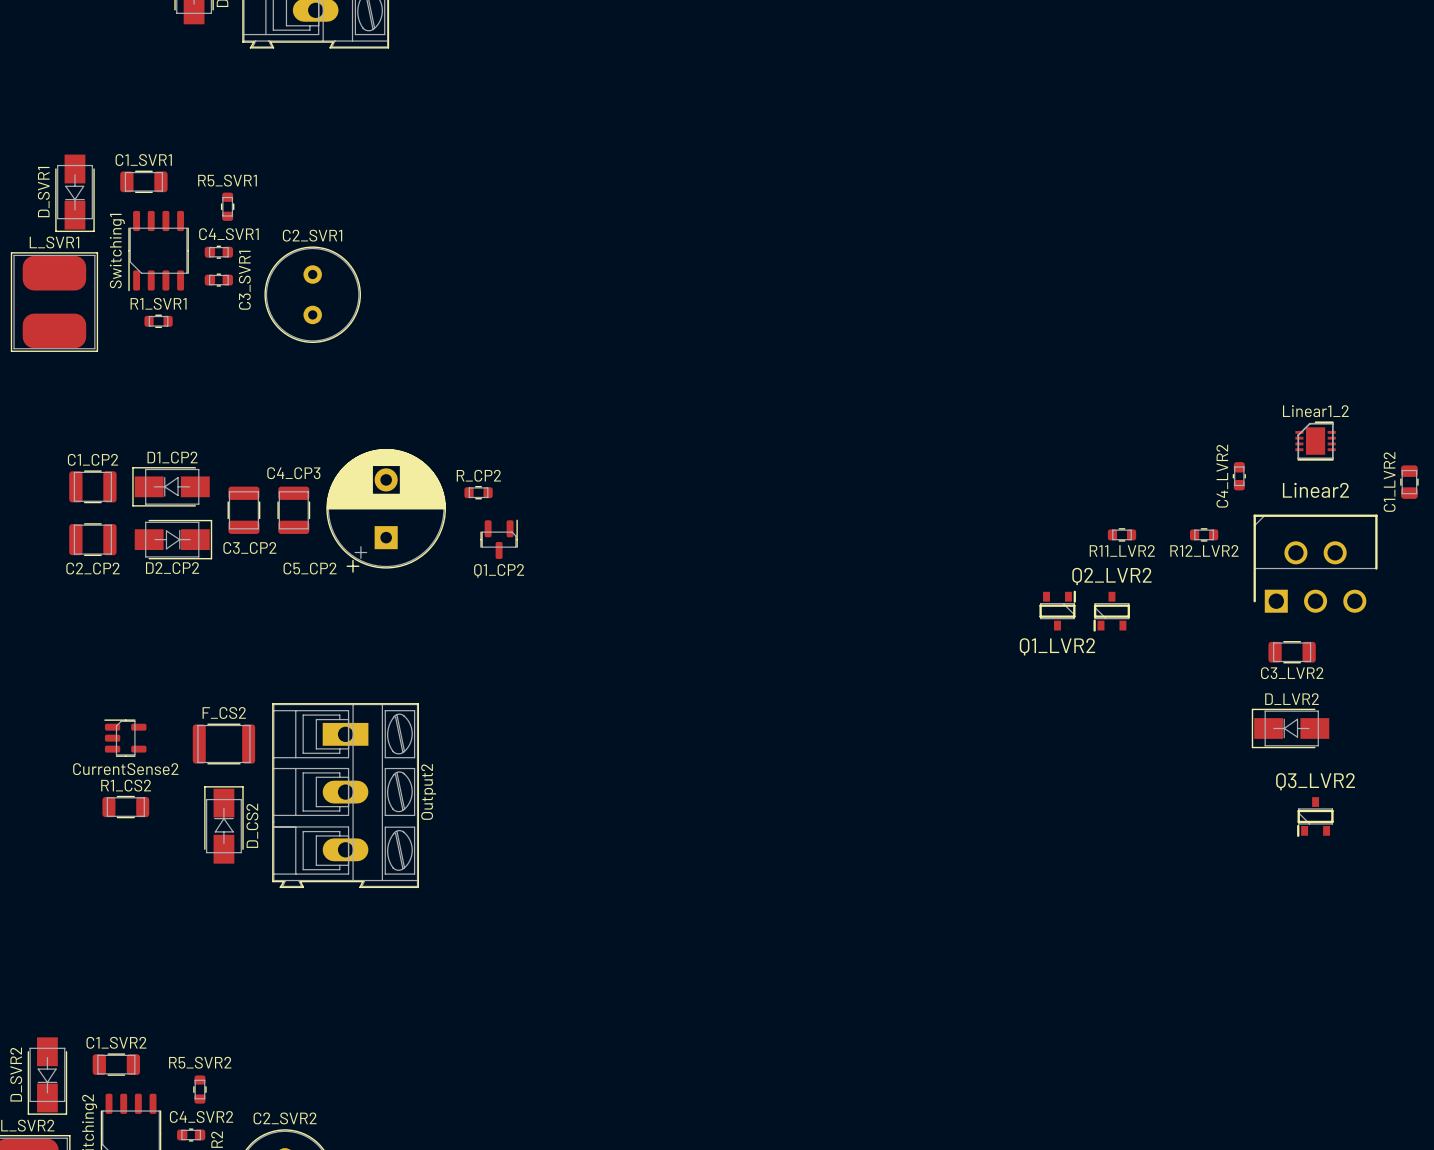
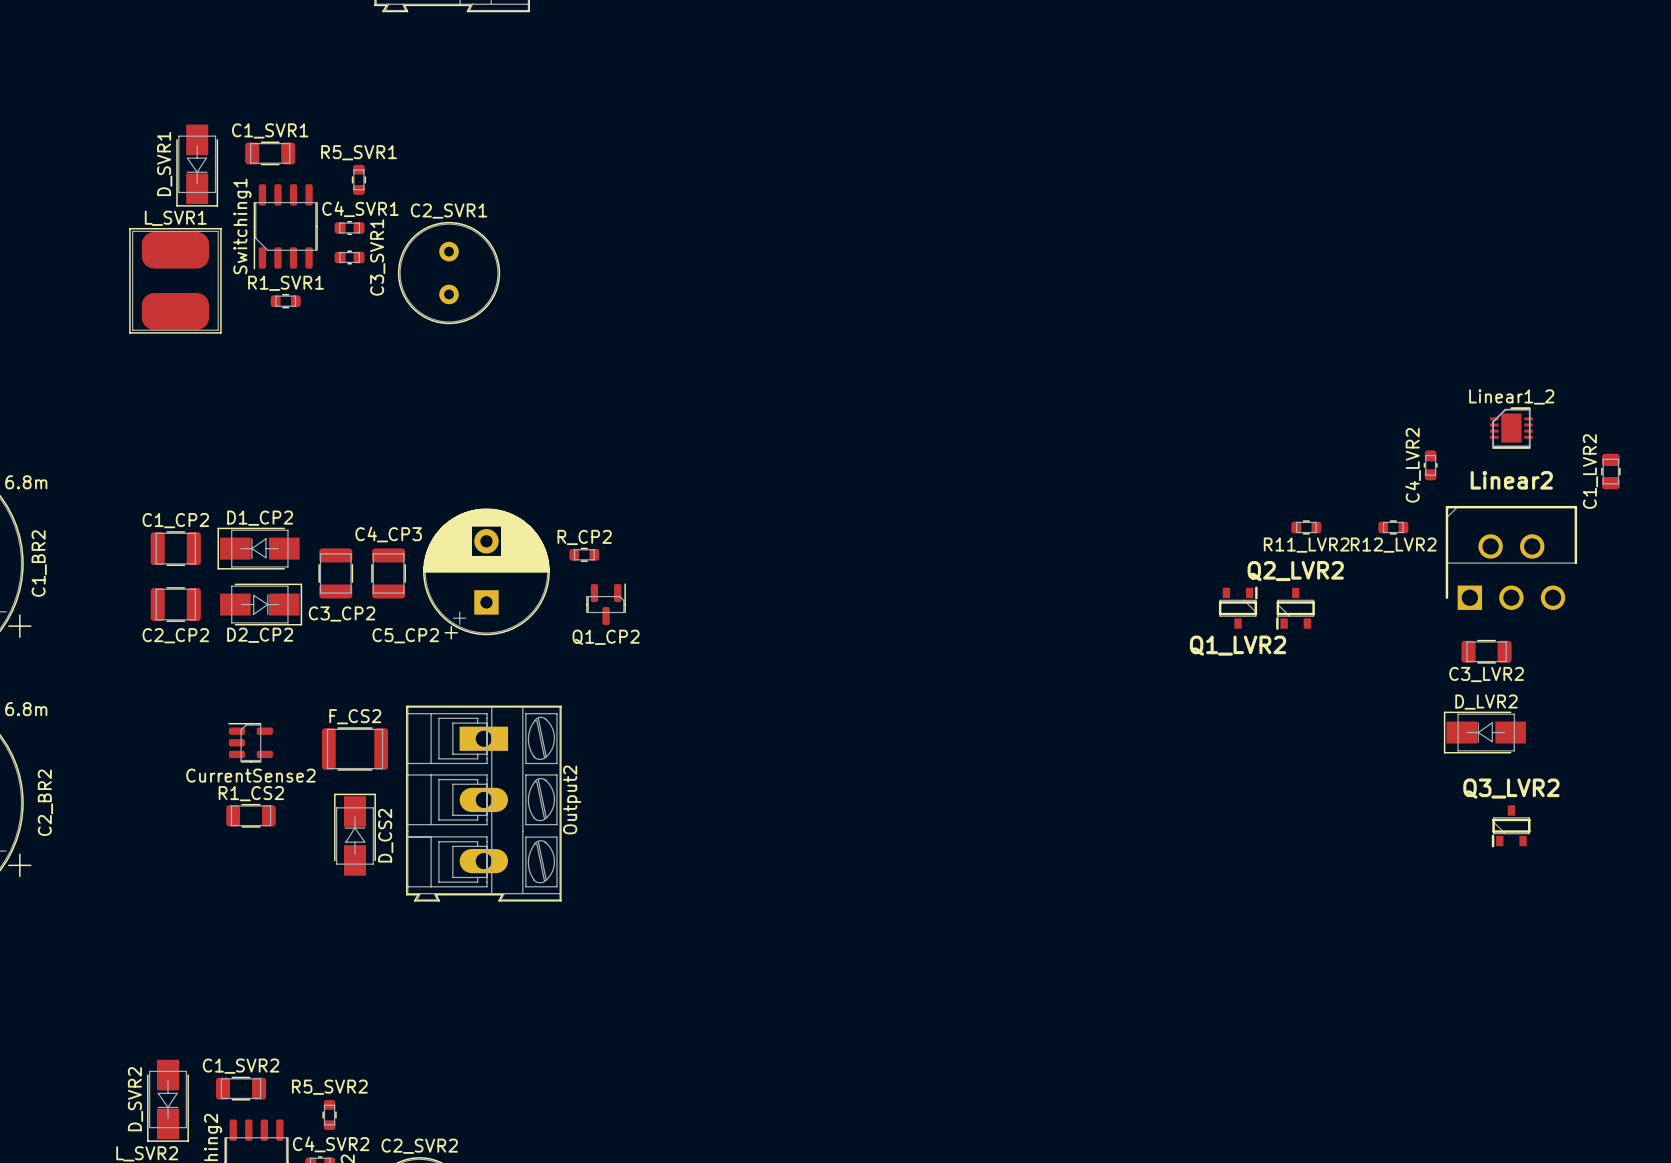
C1_CP2 position: (92, 486) -> (175, 548)
D1_CP2 position: (171, 486) -> (258, 548)
R_CP2 position: (478, 492) -> (584, 554)
C3_CP2 position: (243, 510) -> (335, 573)
C4_CP3 position: (293, 510) -> (388, 573)
C5_CP2 position: (386, 510) -> (486, 574)
C2_CP2 position: (92, 539) -> (175, 604)
D2_CP2 position: (173, 539) -> (261, 604)
Q1_CP2 position: (499, 539) -> (606, 604)

